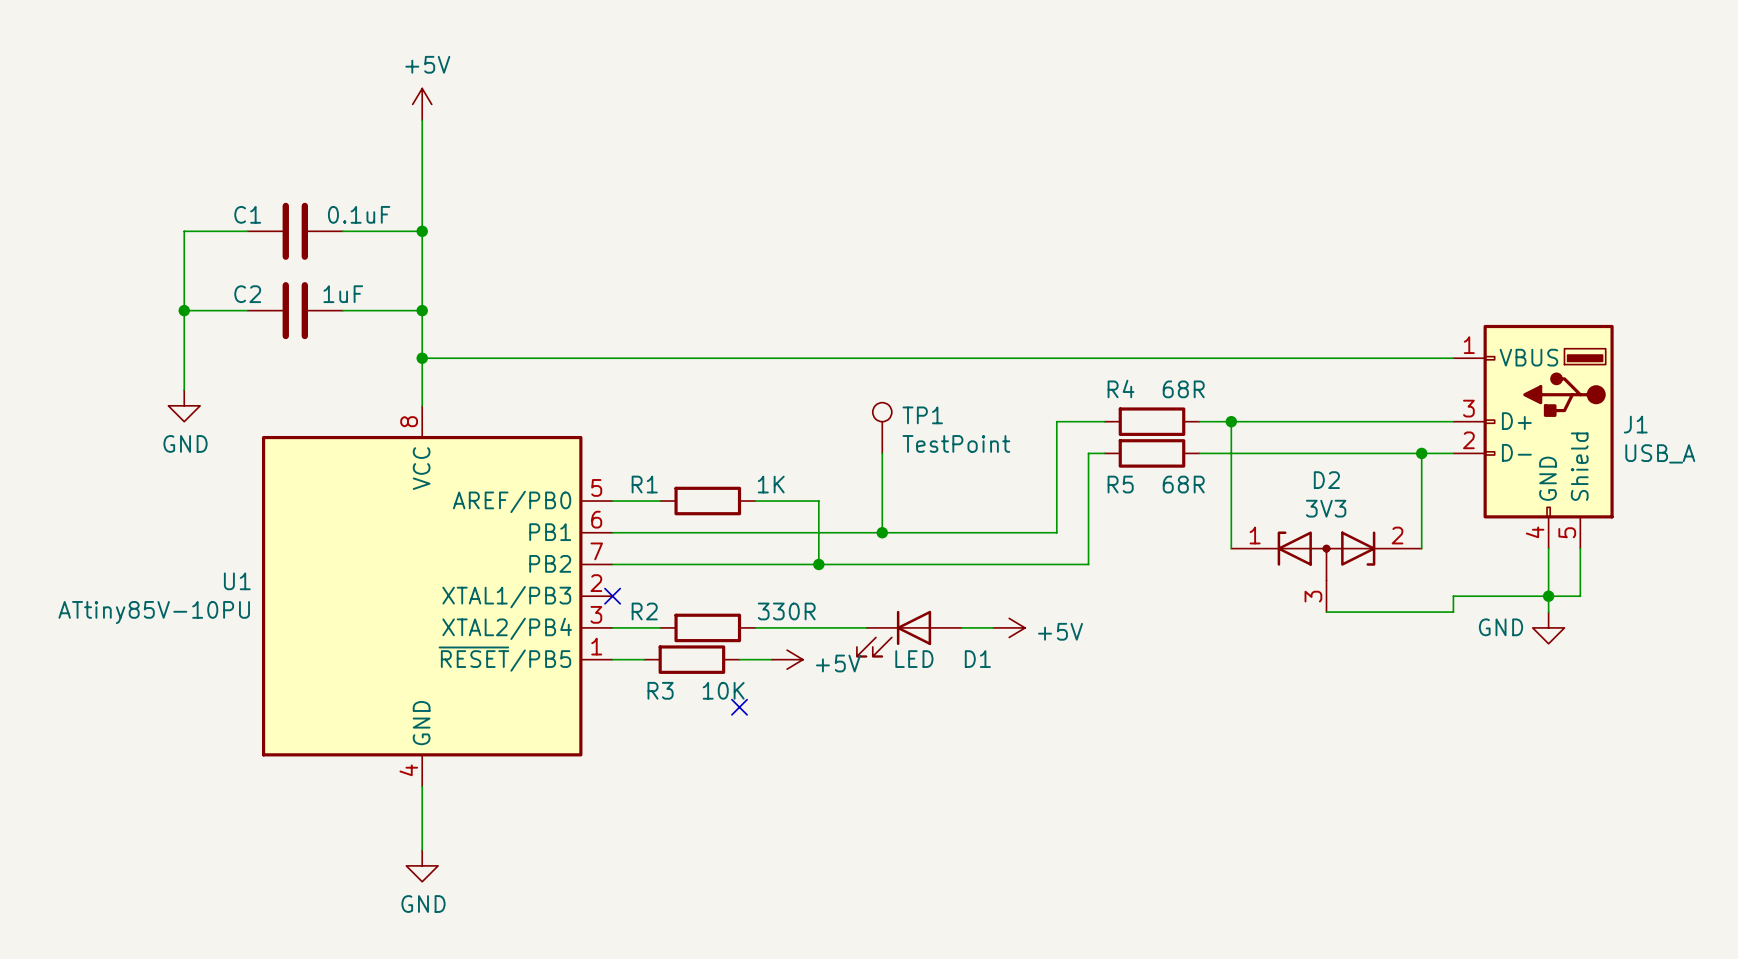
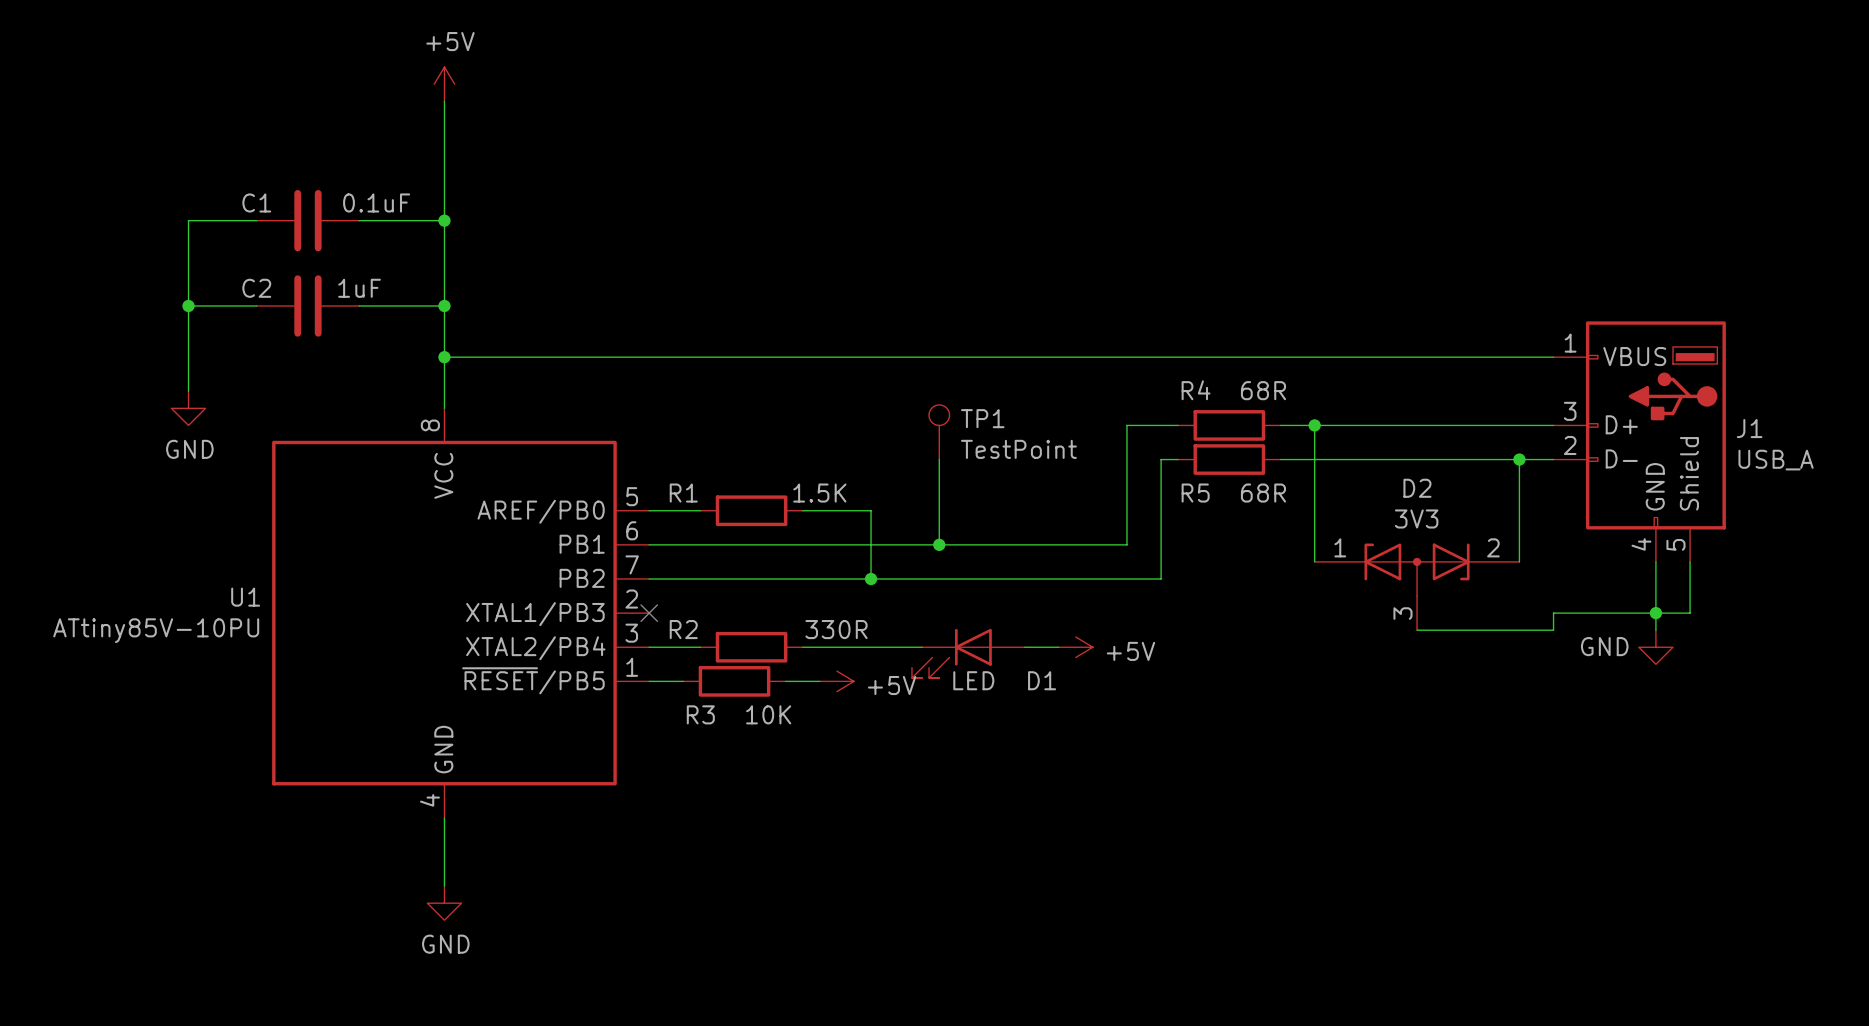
R1 value: 1K (771, 484) -> 1.5K (819, 493)
no-connect mark: (739, 707) -> none

